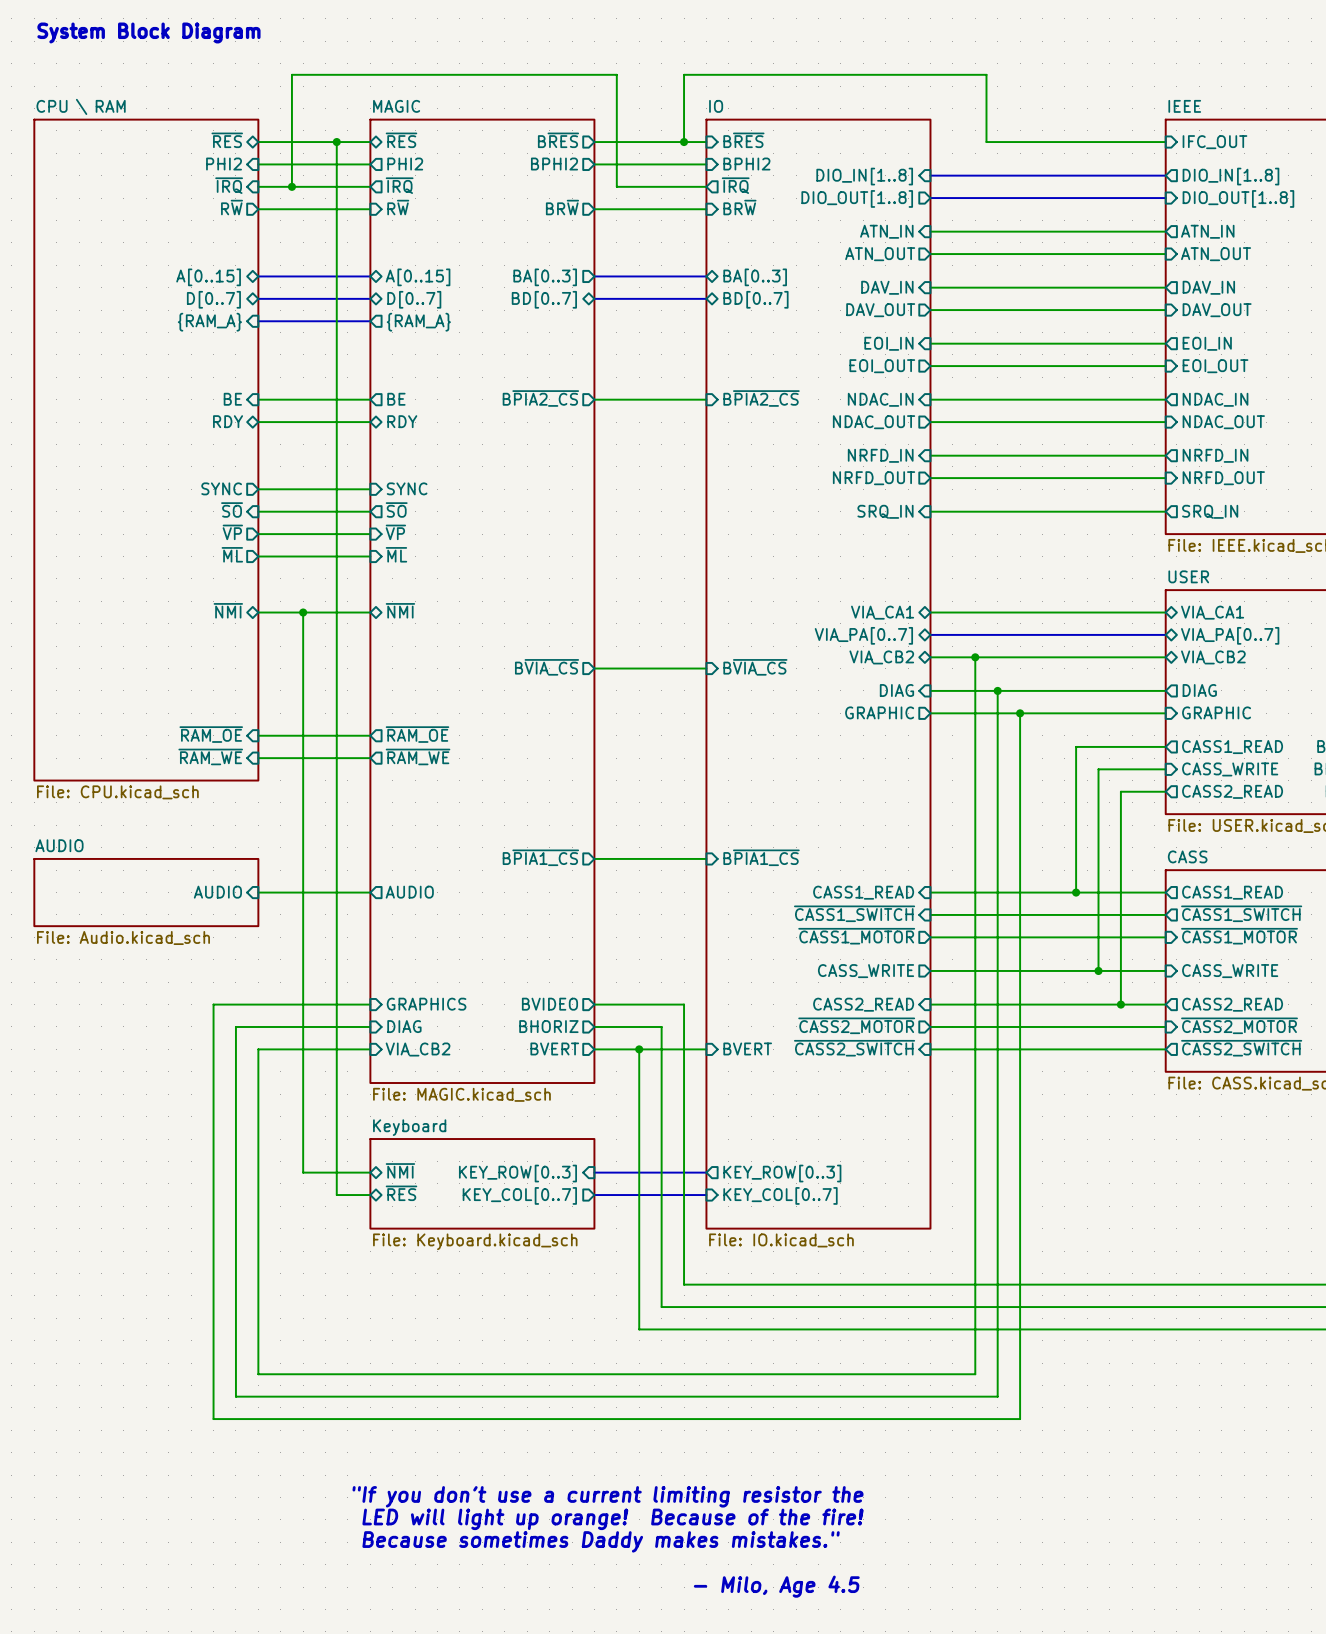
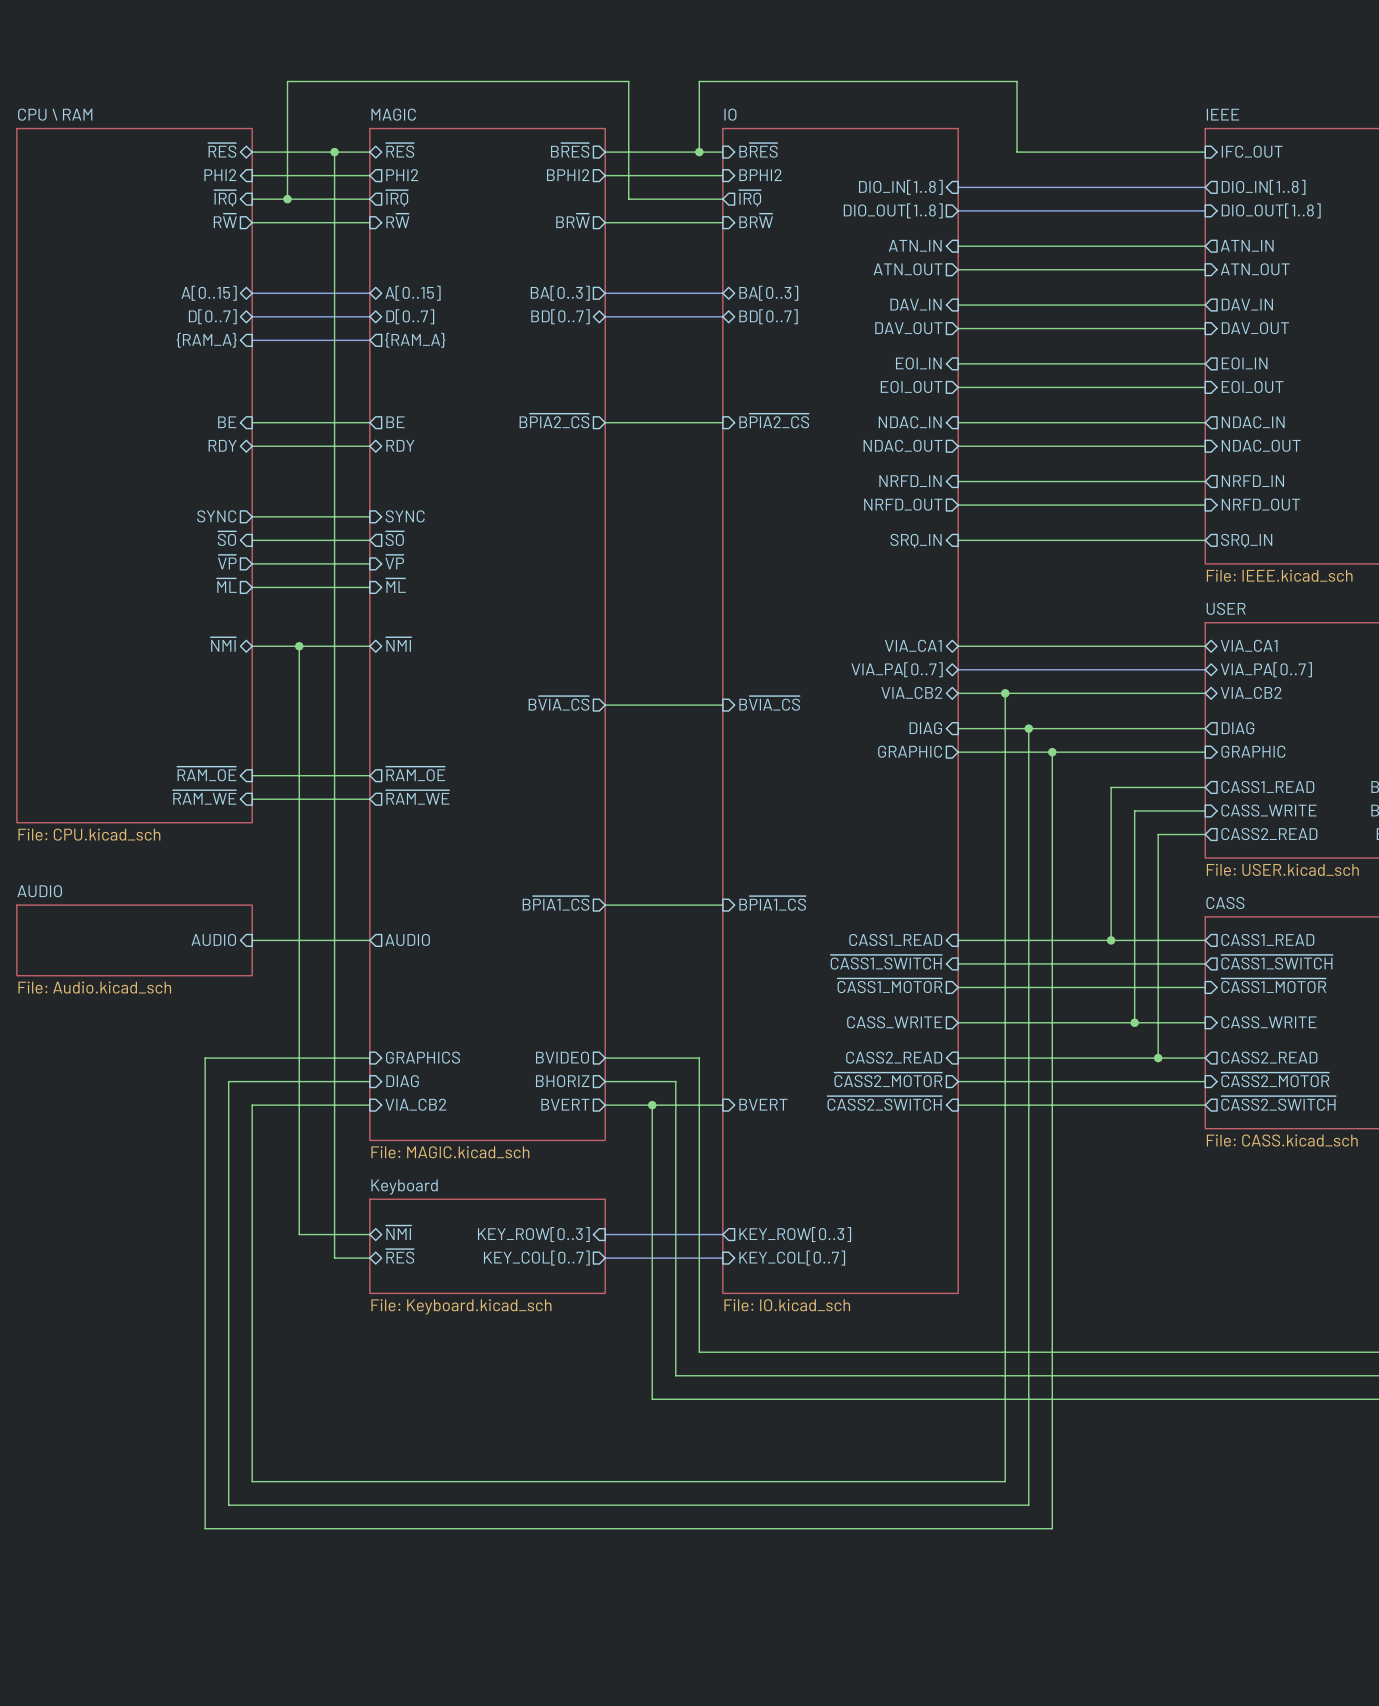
text: System Block Diagram (148, 32) -> none
wire: (258, 1374) (975, 1374) -> (252, 1446) (252, 1481) (1005, 1481) (1005, 1446)
wire: (235, 1396) (997, 1396) -> (228, 1469) (228, 1505) (1028, 1505) (1028, 1469)
wire: (213, 1419) (1020, 1419) -> (205, 1493) (205, 1528) (1052, 1528) (1052, 1493)
text: "If you don't use a current limiting resistor the (608, 1496) -> none
text: LED will light up orange! Because of the fire! (613, 1519) -> none
text: Because sometimes Daddy makes mistakes." (601, 1541) -> none
text: - Milo, Age 4.5 (776, 1586) -> none

